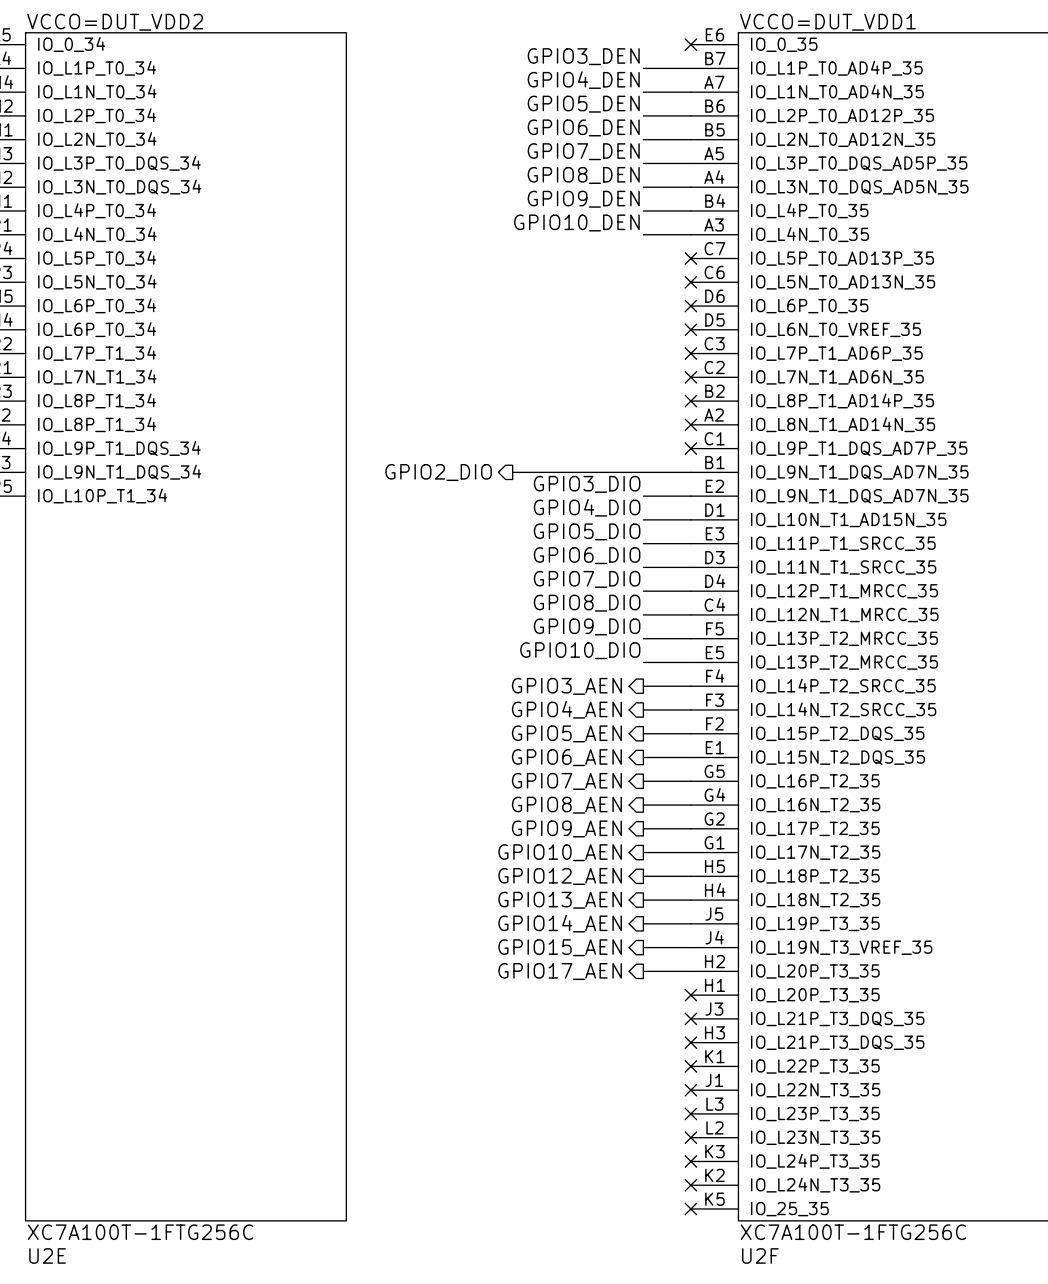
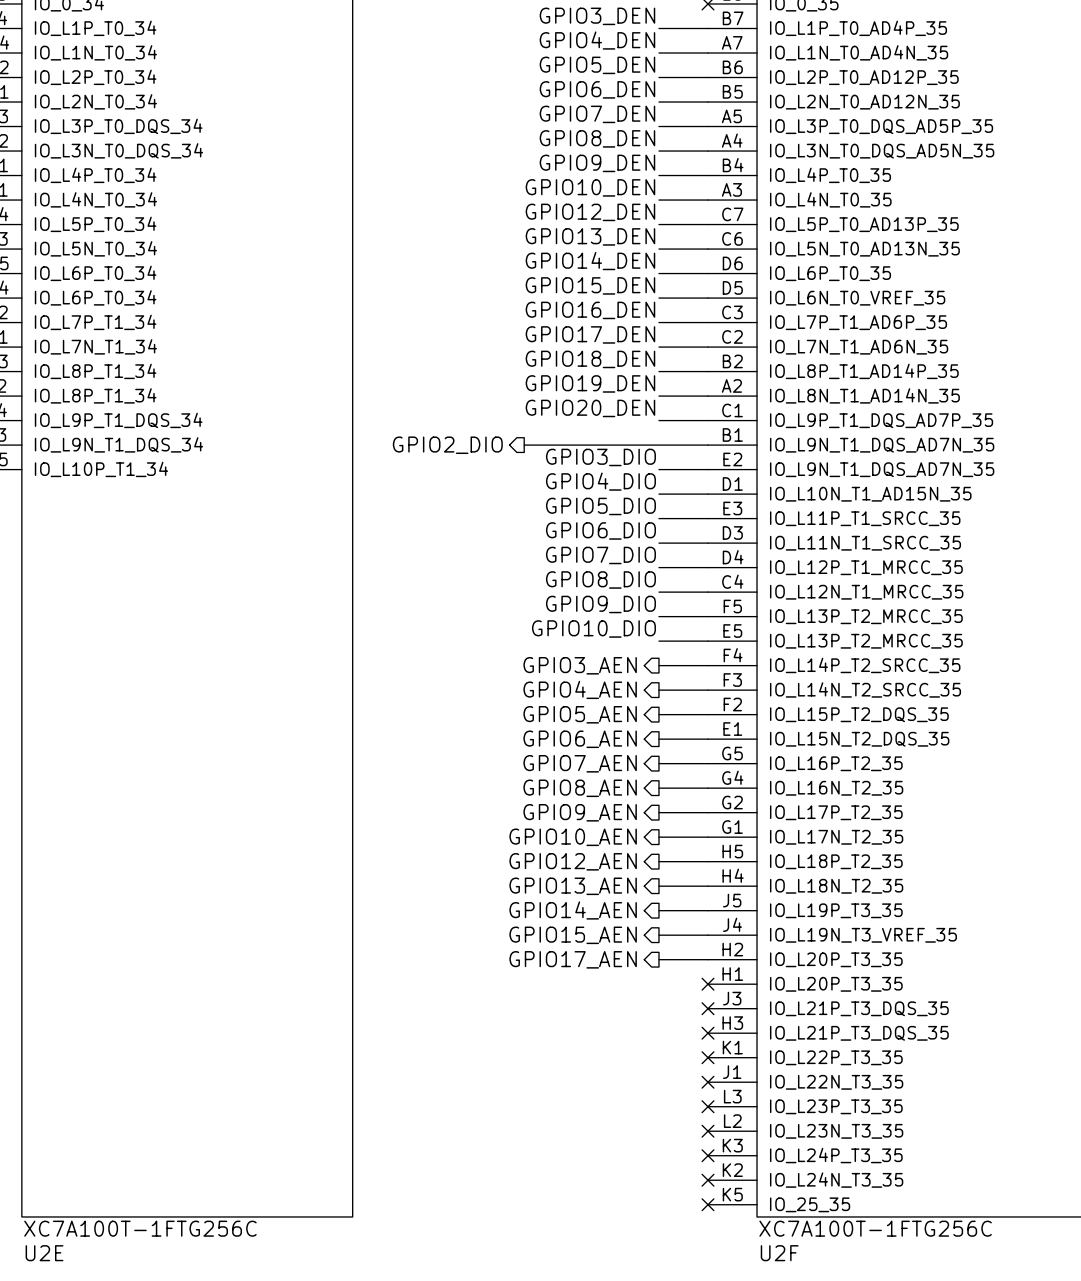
label: none -> GPIO12_DEN (590, 212)
wire: none -> (658, 224) (707, 224)
no-connect mark: (690, 258) -> none
label: none -> GPIO13_DEN (590, 236)
wire: none -> (658, 249) (707, 249)
no-connect mark: (690, 282) -> none
label: none -> GPIO14_DEN (590, 261)
wire: none -> (658, 273) (707, 273)
no-connect mark: (690, 306) -> none
label: none -> GPIO15_DEN (590, 285)
wire: none -> (658, 298) (707, 298)
no-connect mark: (690, 329) -> none
label: none -> GPIO16_DEN (590, 310)
wire: none -> (658, 322) (707, 322)
no-connect mark: (690, 353) -> none
label: none -> GPIO17_DEN (590, 334)
wire: none -> (658, 347) (707, 347)
no-connect mark: (690, 377) -> none
label: none -> GPIO18_DEN (590, 359)
wire: none -> (658, 371) (707, 371)
no-connect mark: (690, 401) -> none
label: none -> GPIO19_DEN (590, 383)
wire: none -> (658, 396) (707, 396)
no-connect mark: (690, 424) -> none
label: none -> GPIO20_DEN (590, 408)
wire: none -> (658, 420) (707, 420)
no-connect mark: (690, 448) -> none

